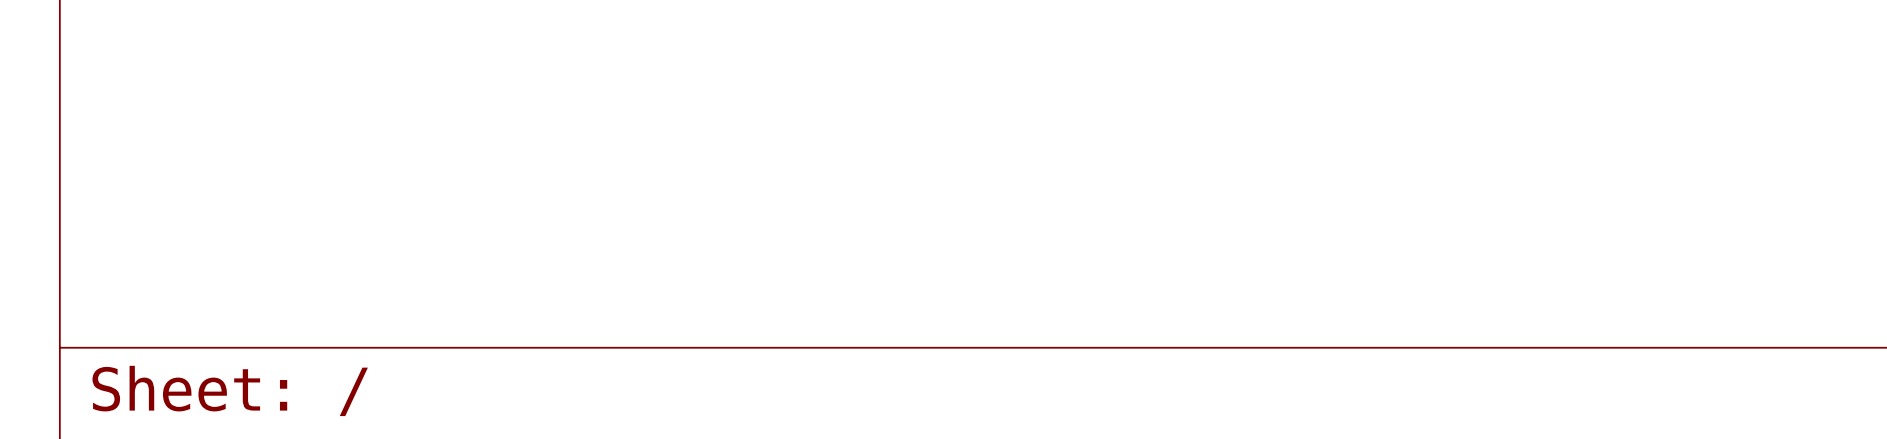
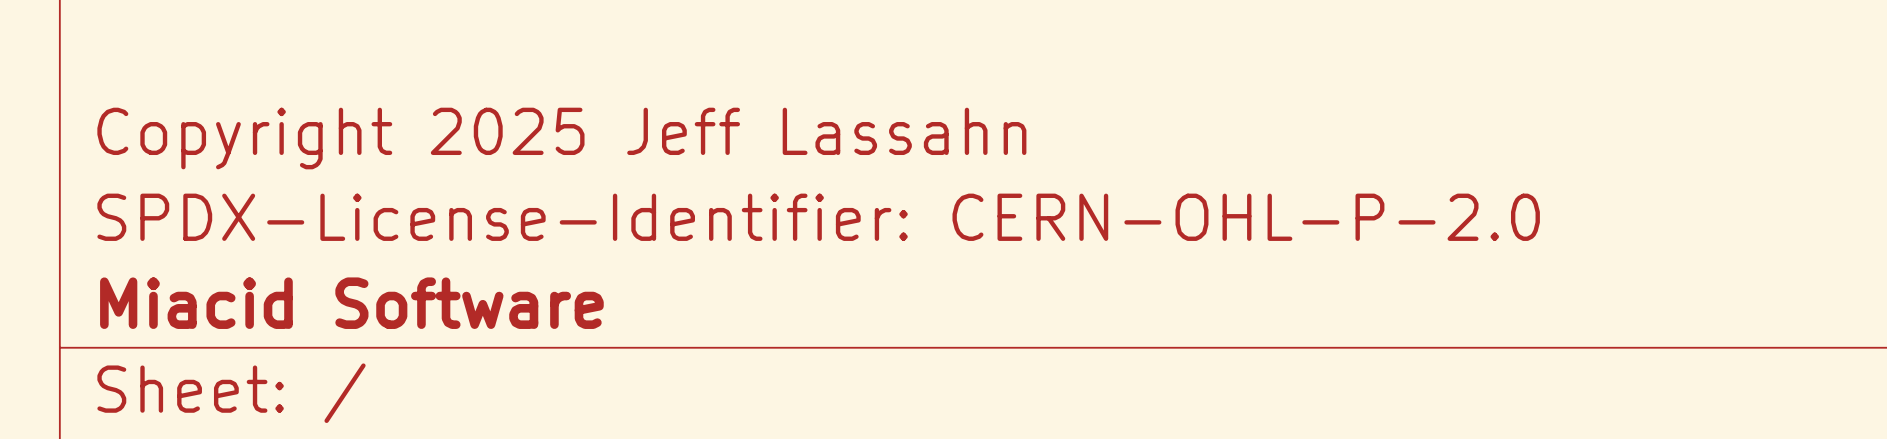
title block: none -> Copyright 2025 Jeff Lassahn (561, 138)
title block: none -> SPDX-License-Identifier: CERN-OHL-P-2.0 (818, 217)
title block: none -> Miacid Software (351, 303)

